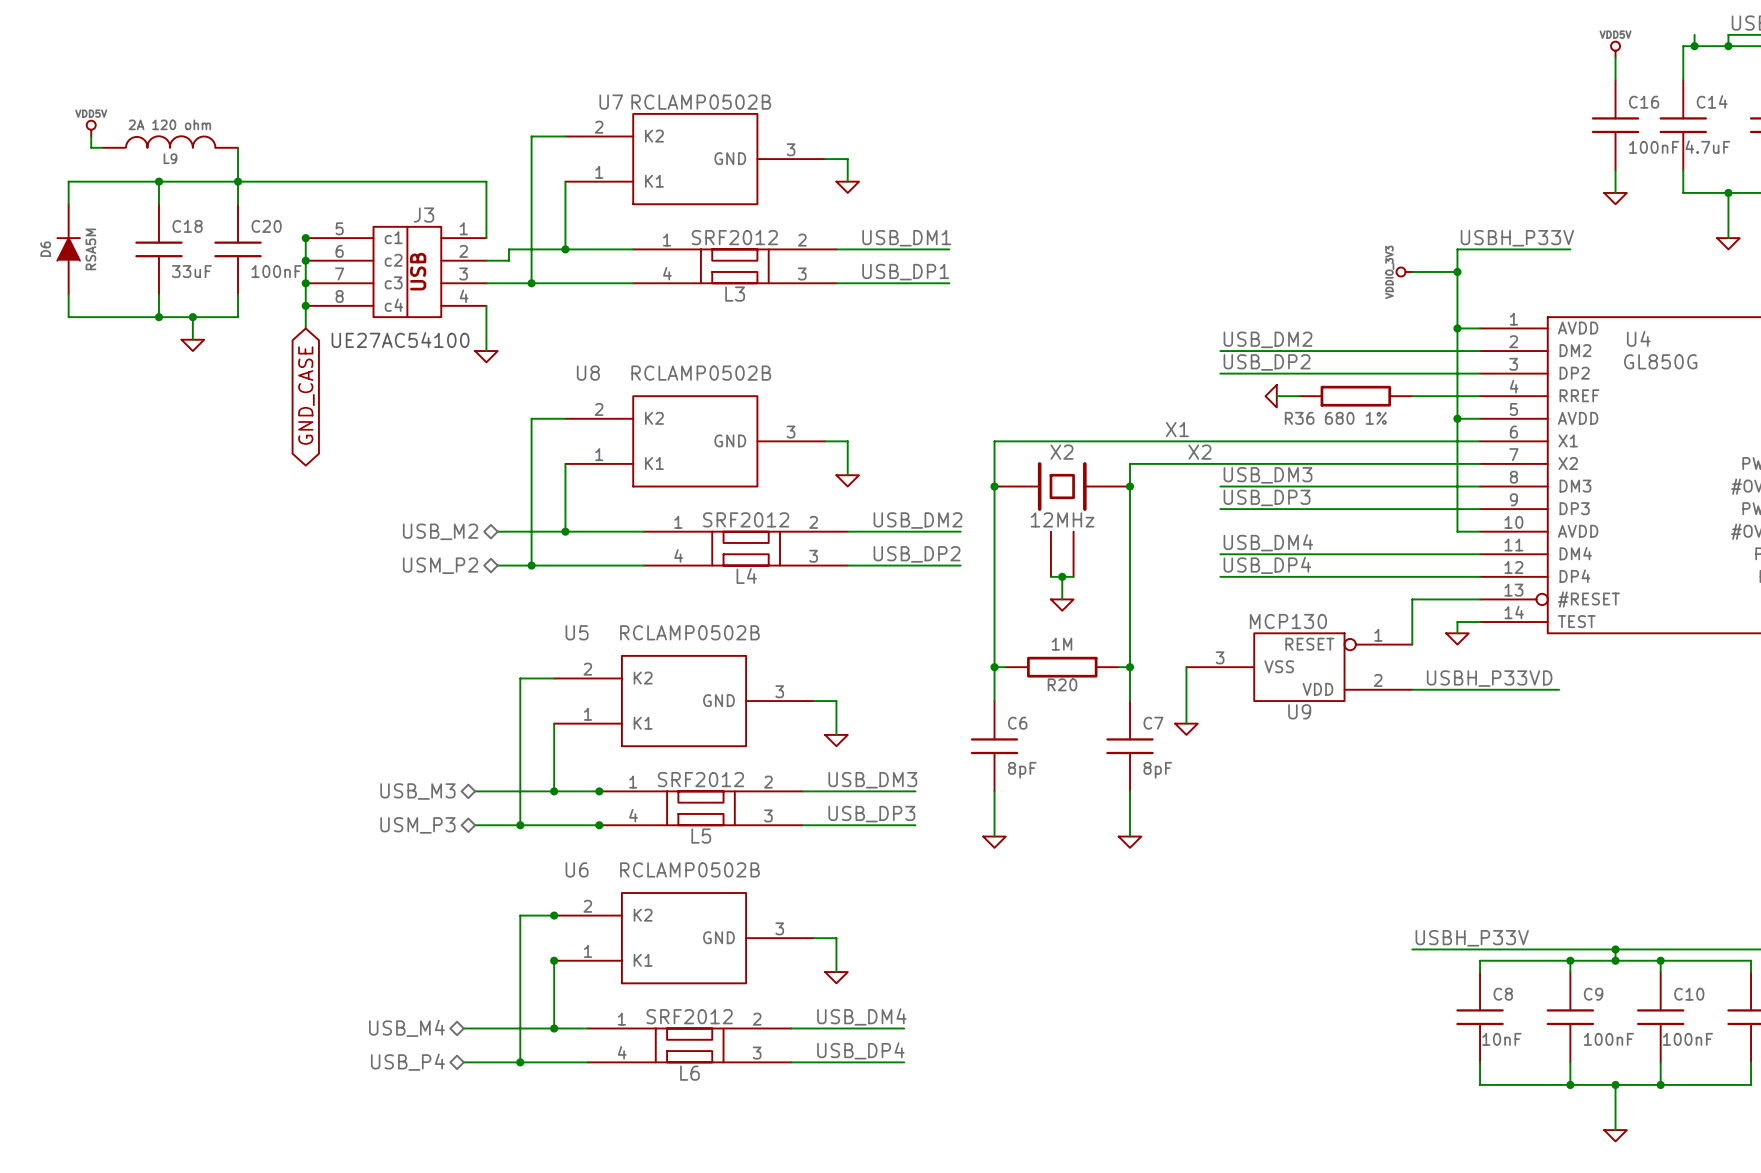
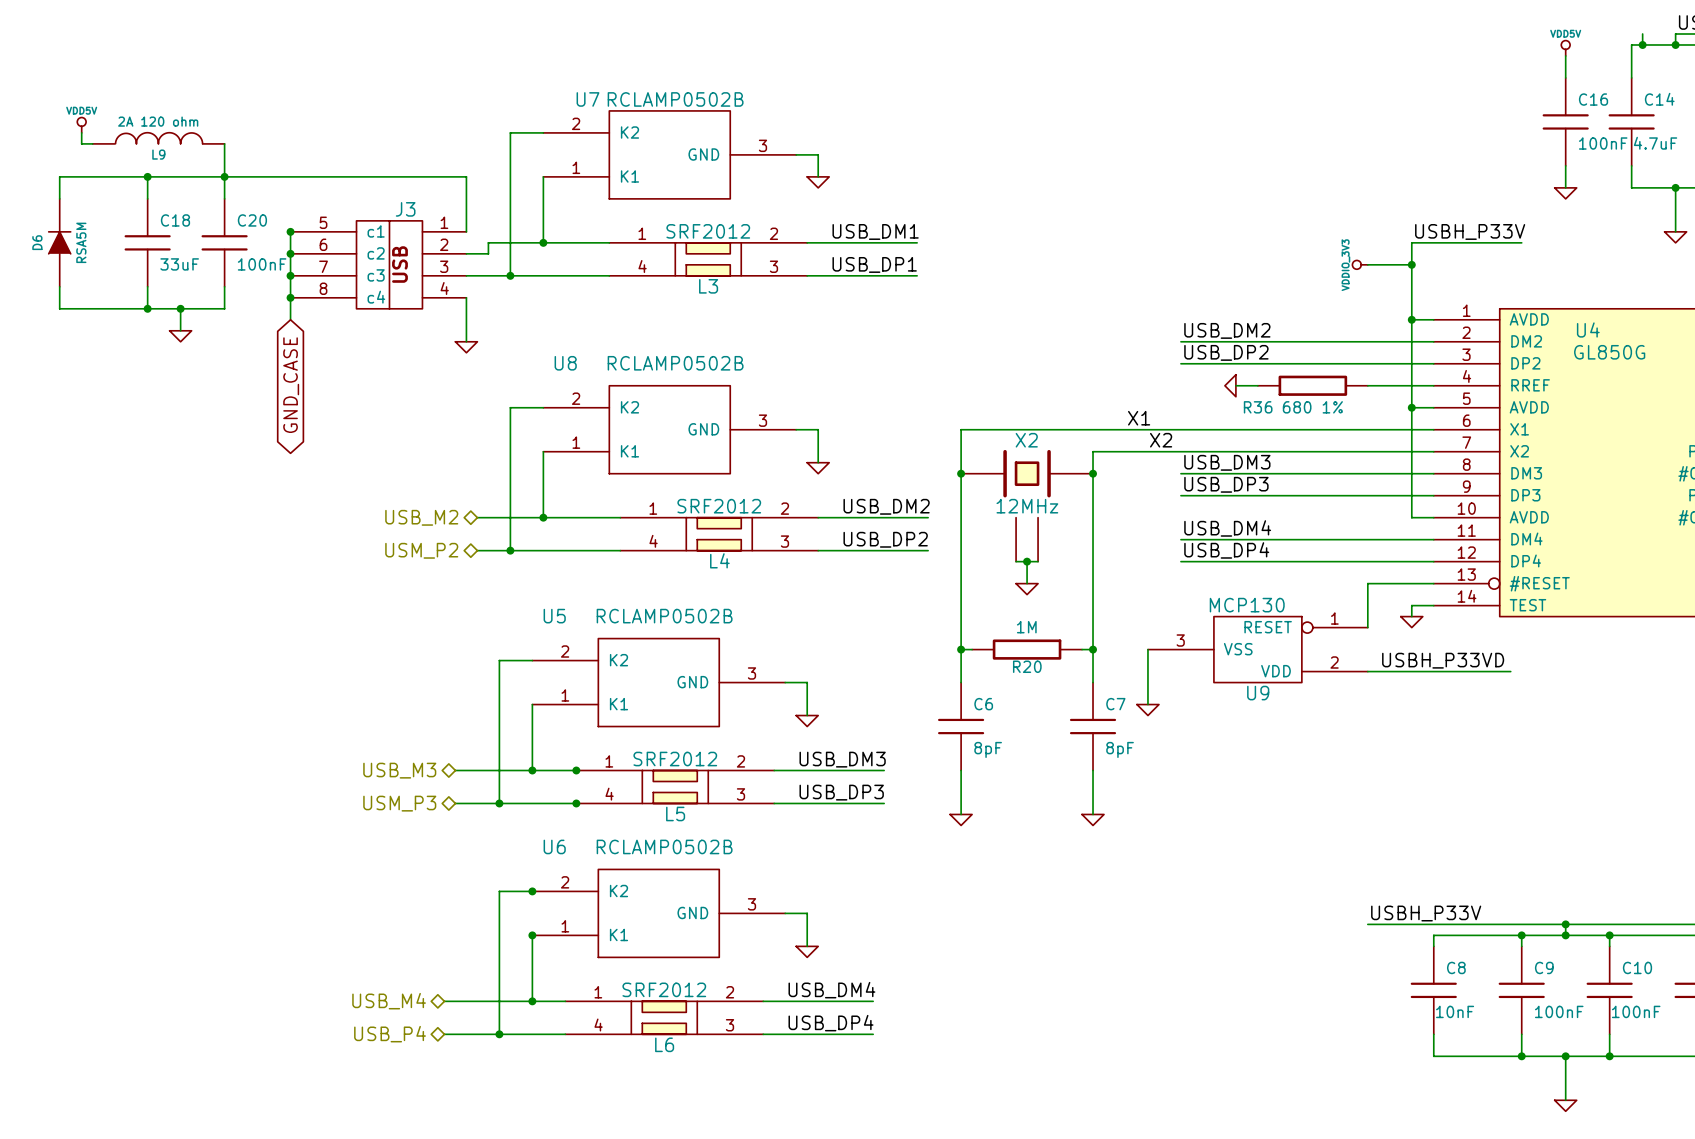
text: UE27AC54100 (400, 340) -> none

